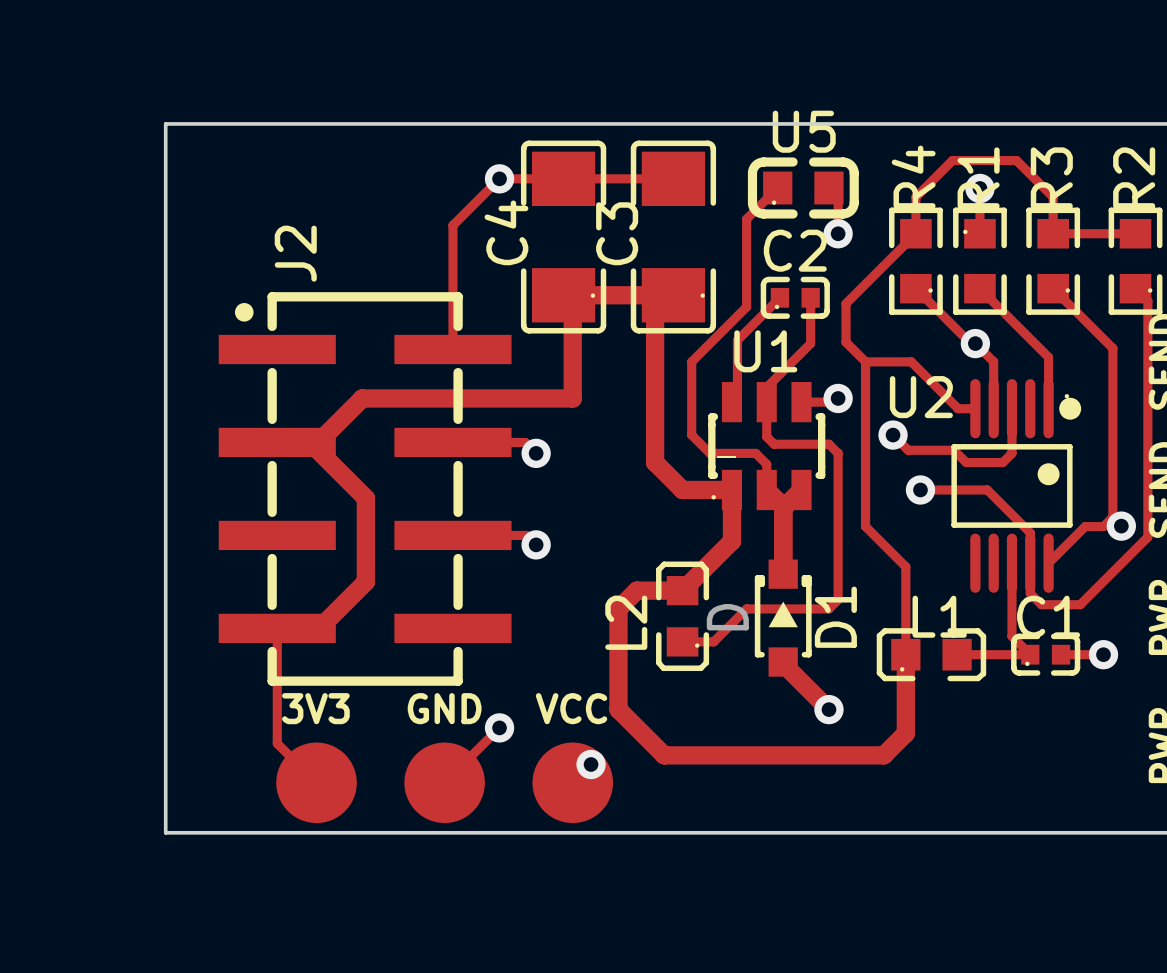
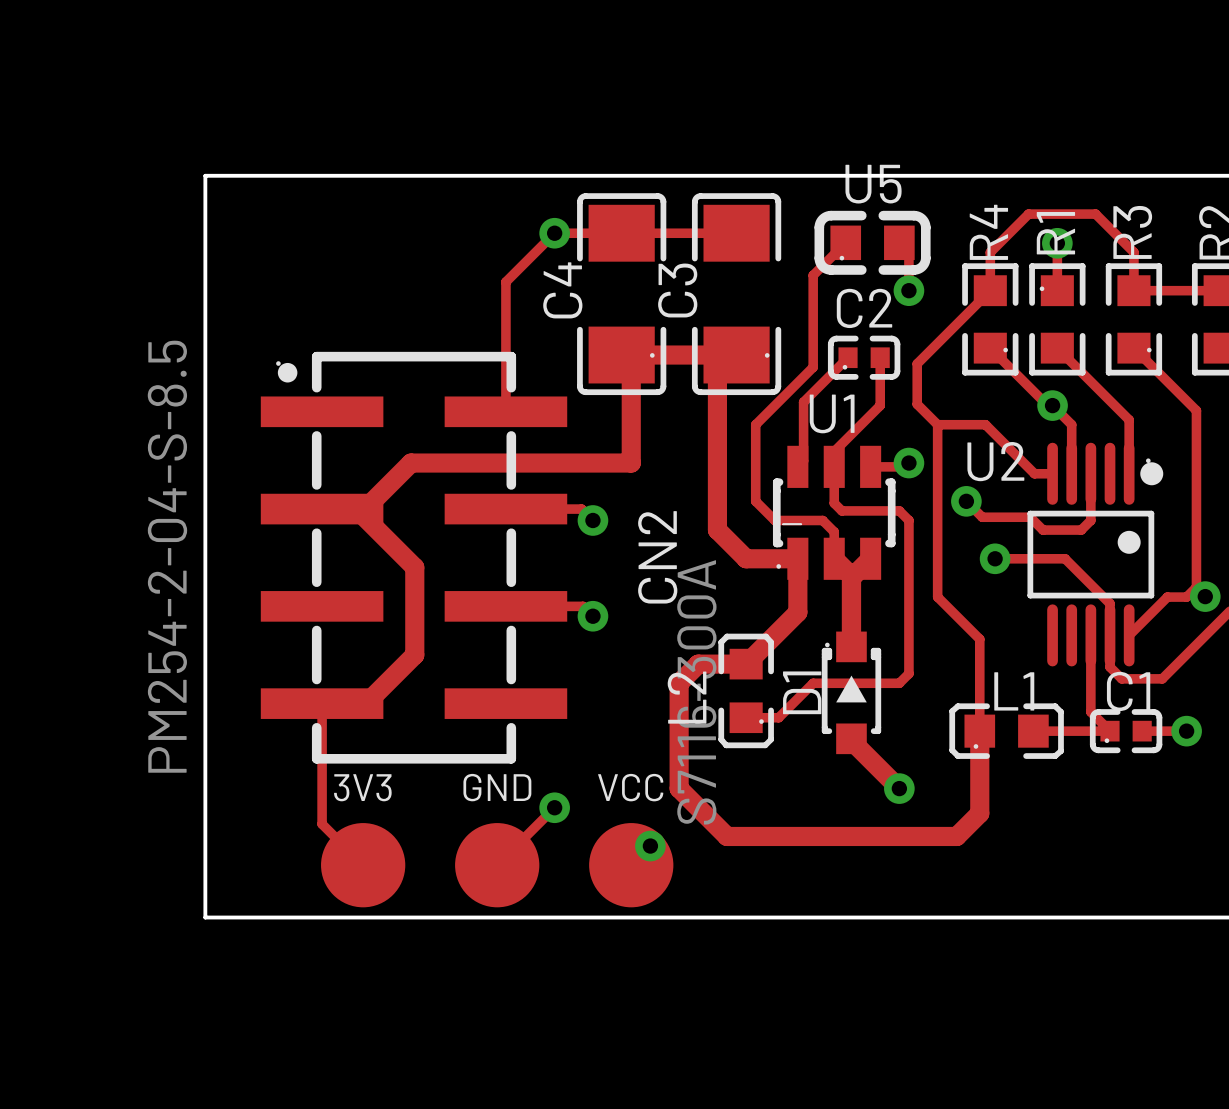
J2: (365, 488) -> none
CN2: none -> PM254-2-04-S-8.5 (414, 557)
D1 footprint: [754, 559, 812, 677] -> [821, 631, 882, 755]
D1 value: D (727, 617) -> S7116-300A (696, 692)
D1 name position: D1 (835, 617) -> D1 (802, 692)

